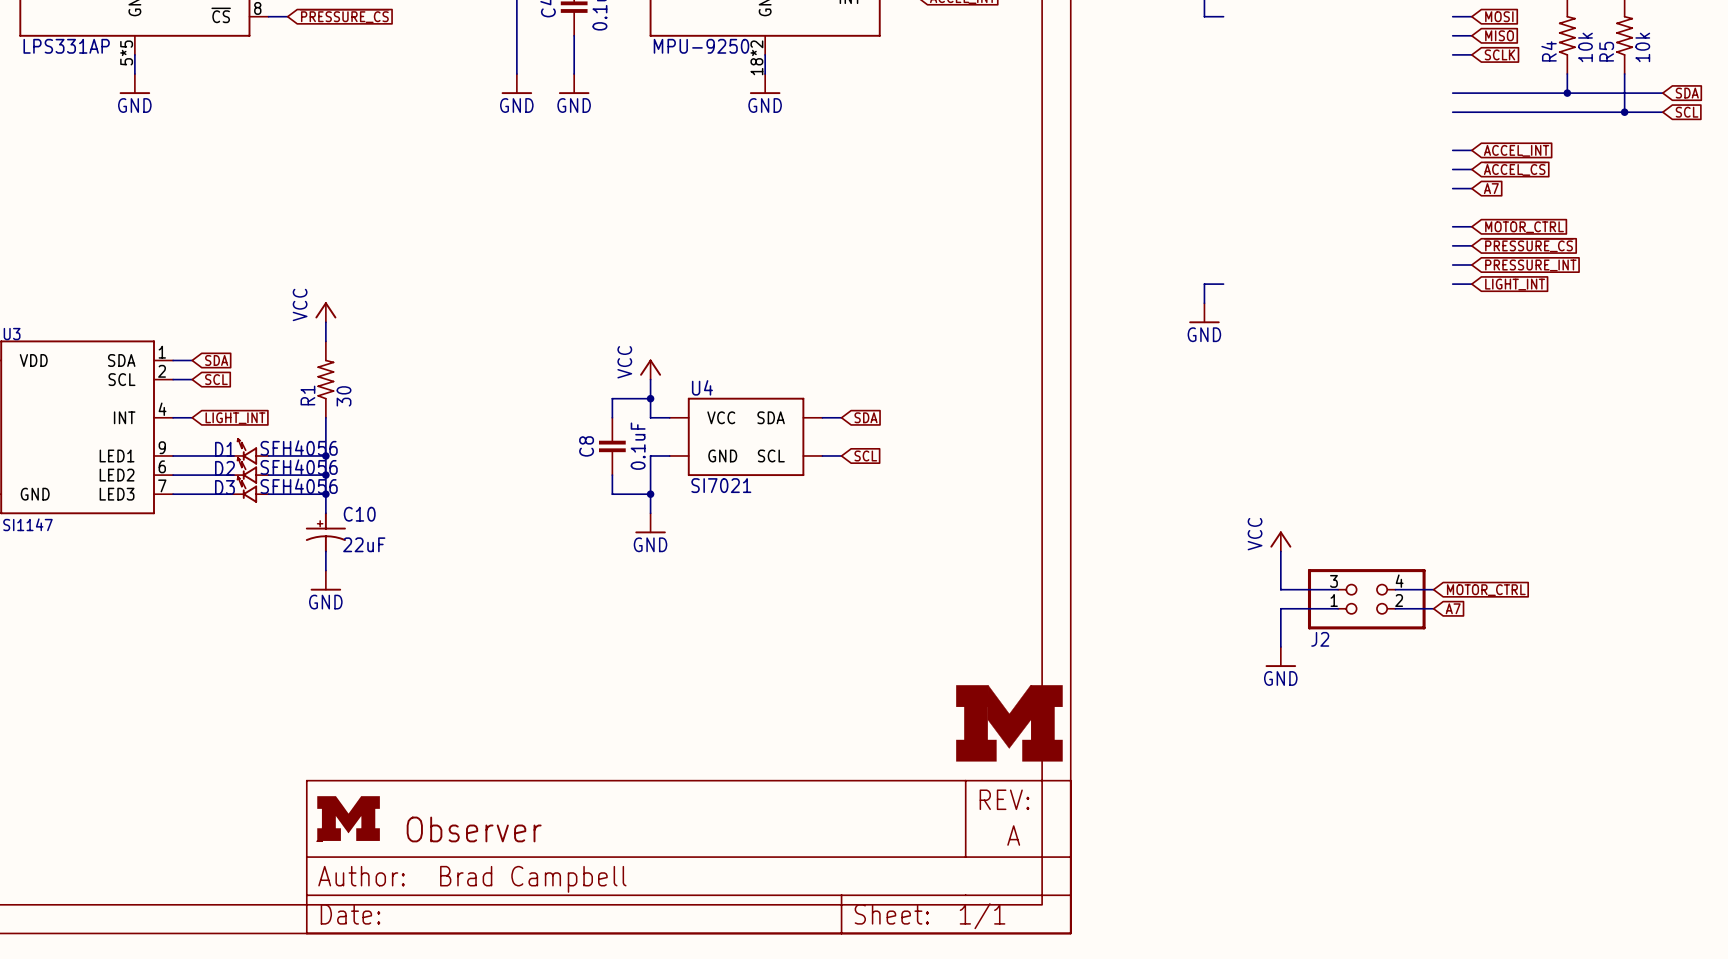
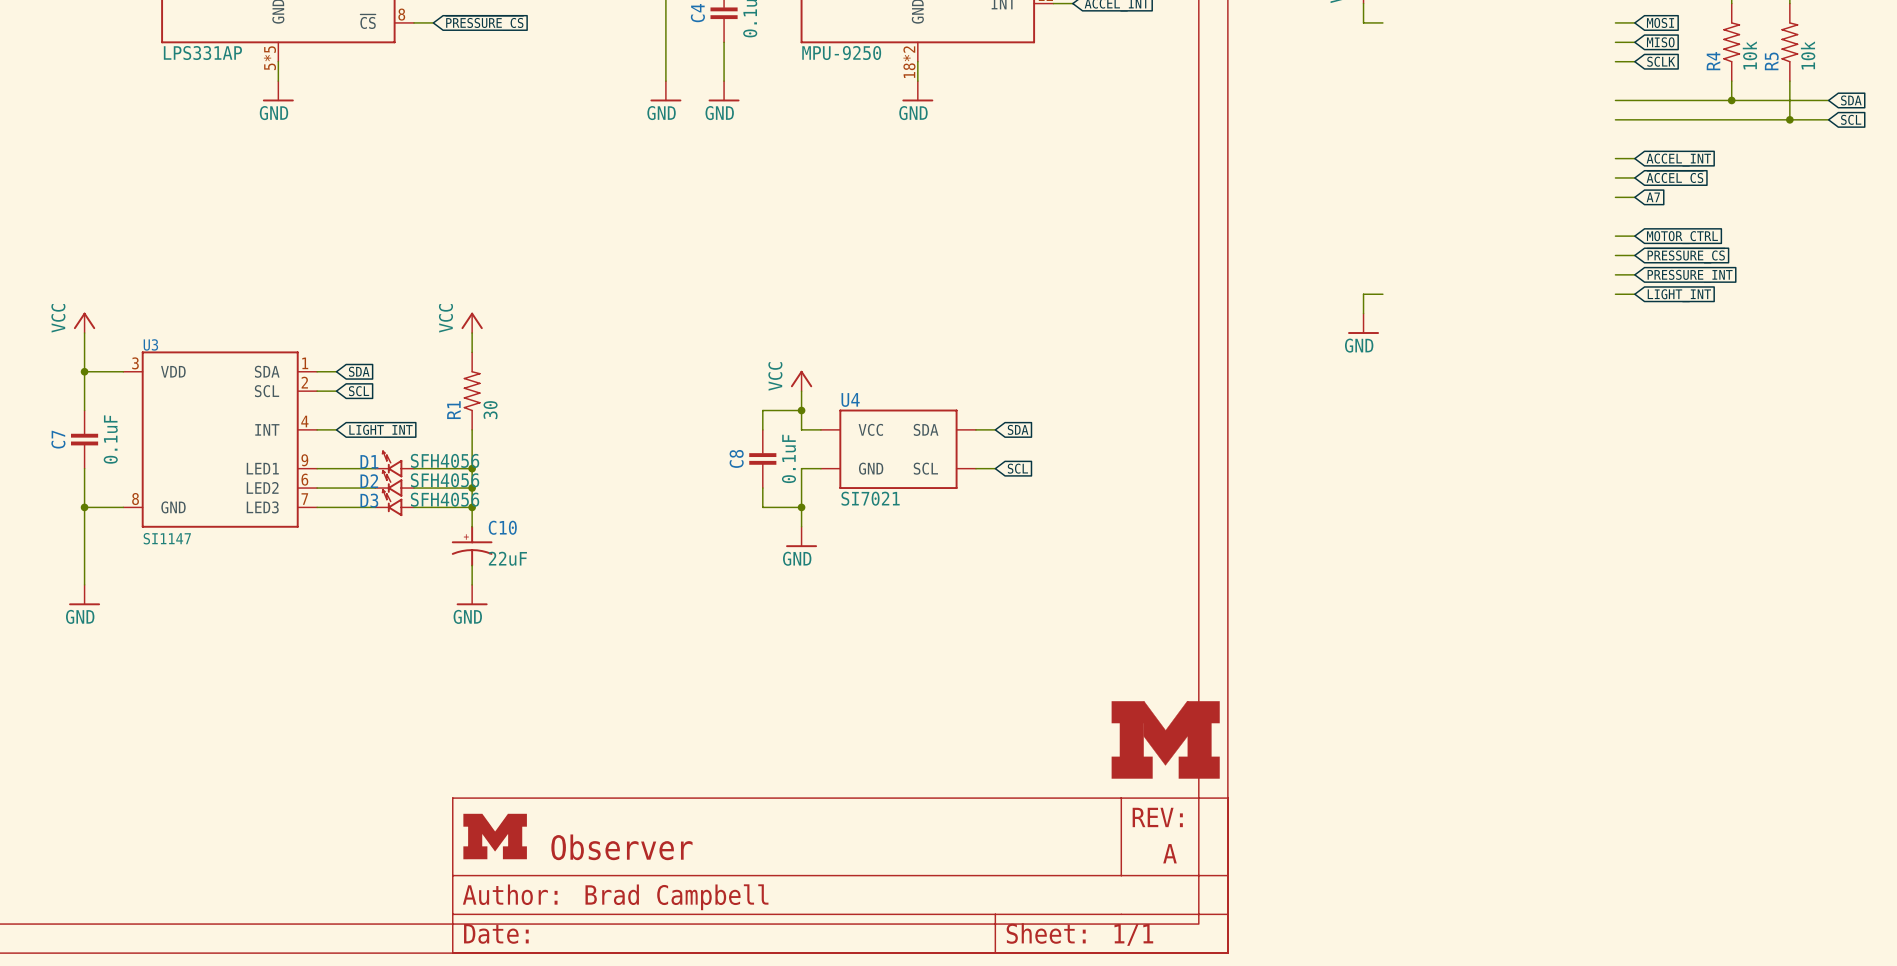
power symbol: VCC (1280, 541) -> none
wire: (1280, 551) (1280, 589) (1338, 589) -> none
wire: (1395, 589) (1433, 589) -> none
global label: MOTOR_CTRL (1486, 590) -> none
J2: (1366, 599) -> none
wire: (1338, 608) (1280, 608) (1280, 646) -> none
wire: (1395, 608) (1433, 608) -> none
global label: A7 (1453, 608) -> none
power symbol: GND (1280, 657) -> none

